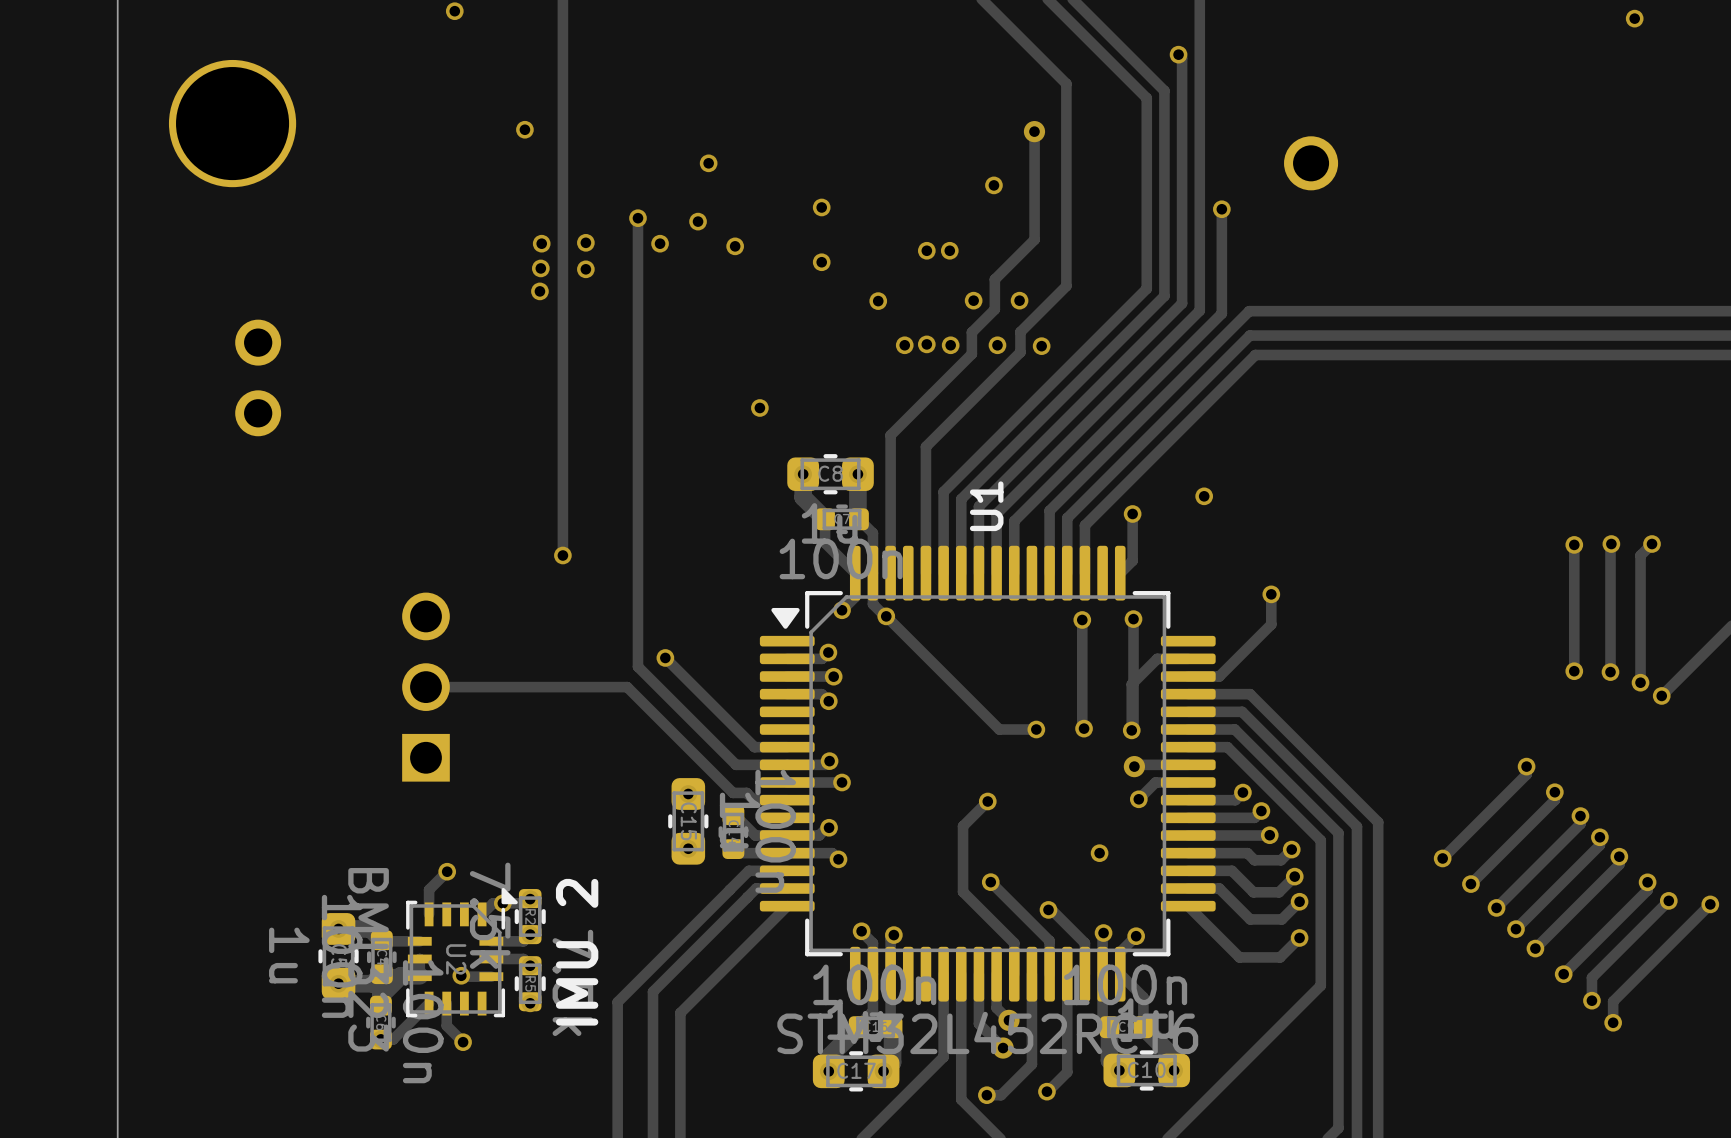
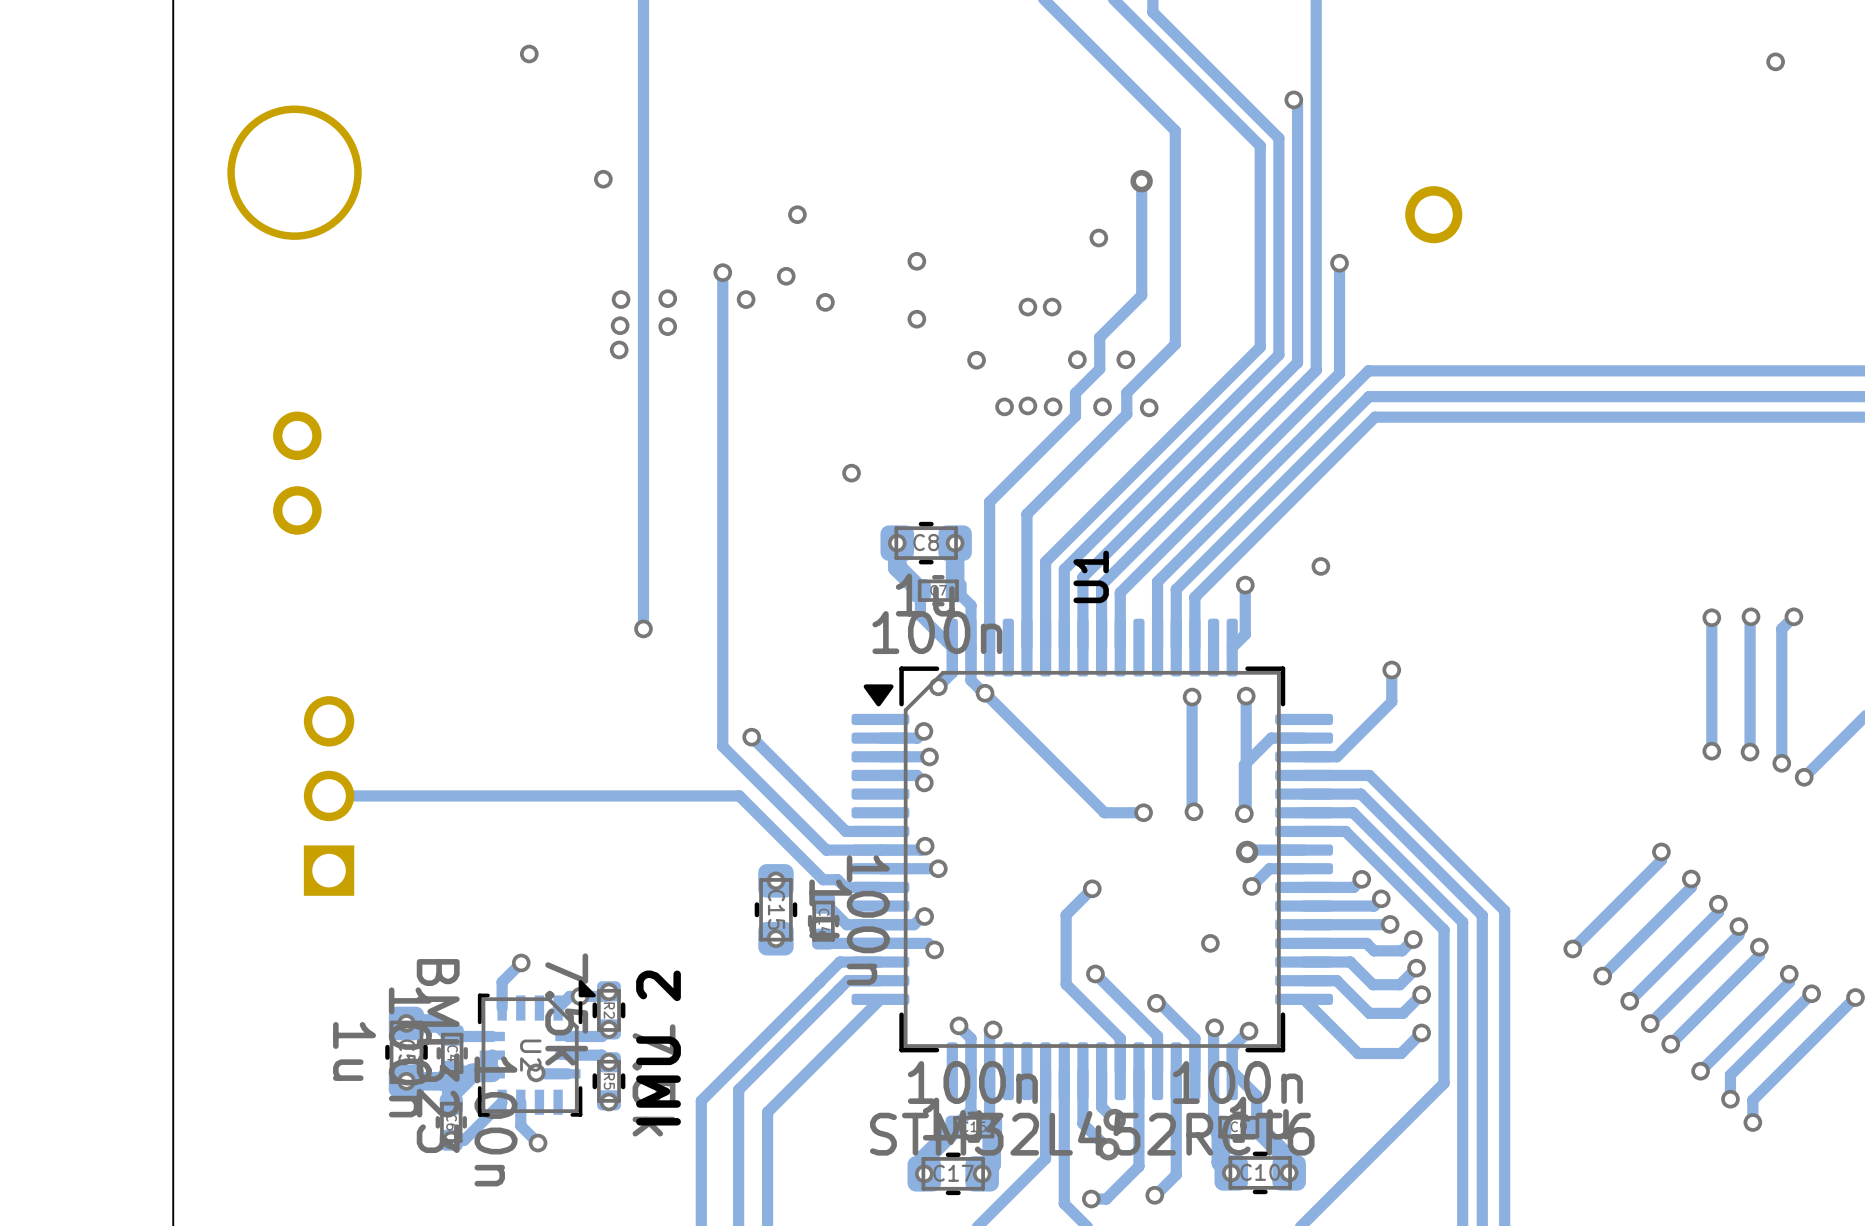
part position: (258, 377) -> (297, 473)
track: (425, 687) (627, 687) (653, 713) -> (329, 795) (739, 795)
part position: (425, 687) -> (329, 795)

